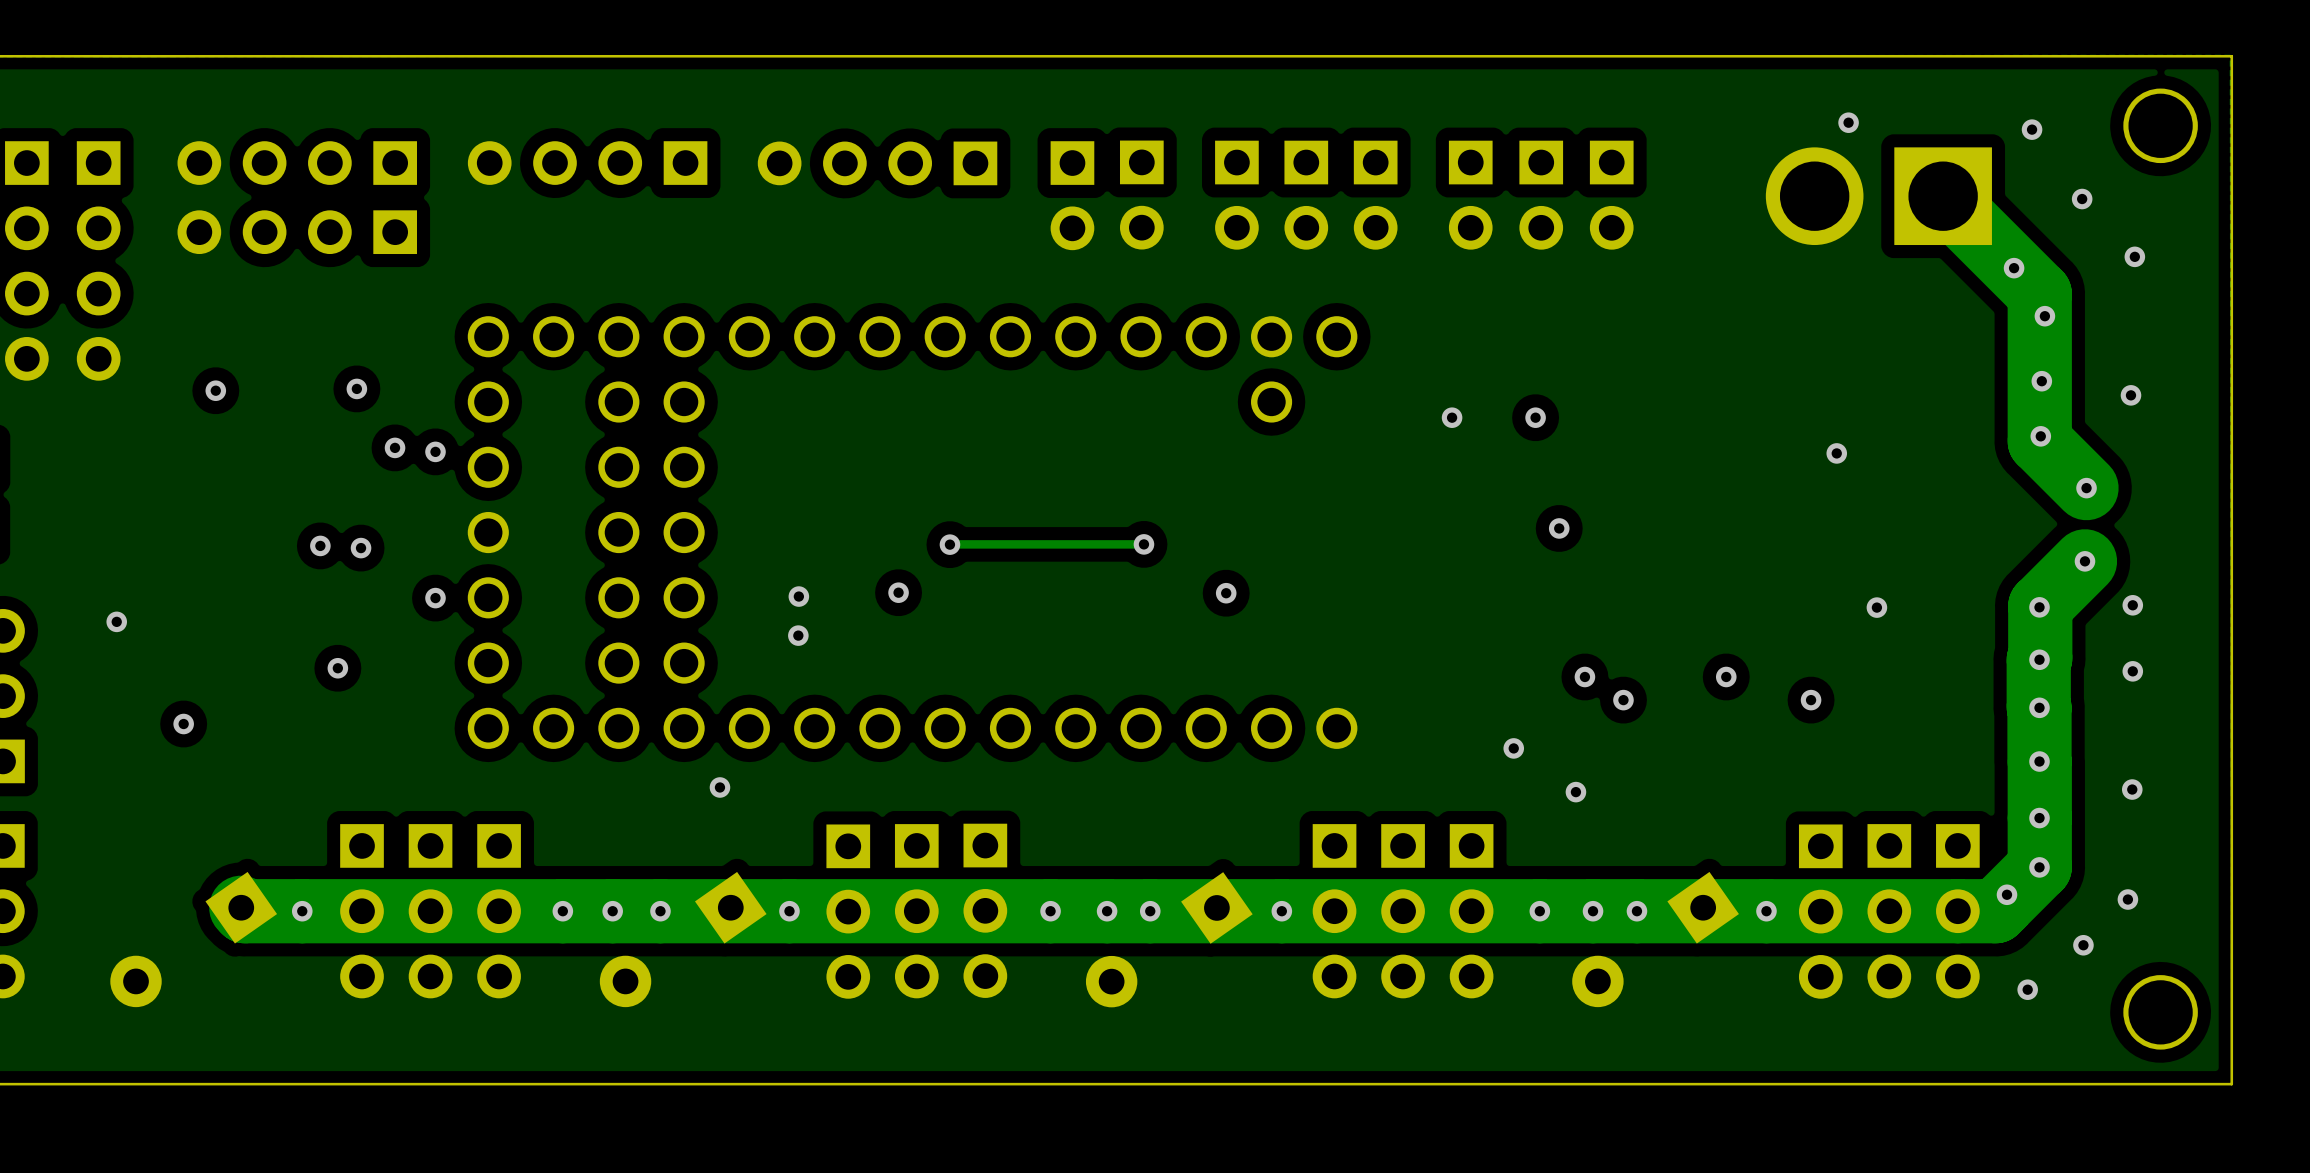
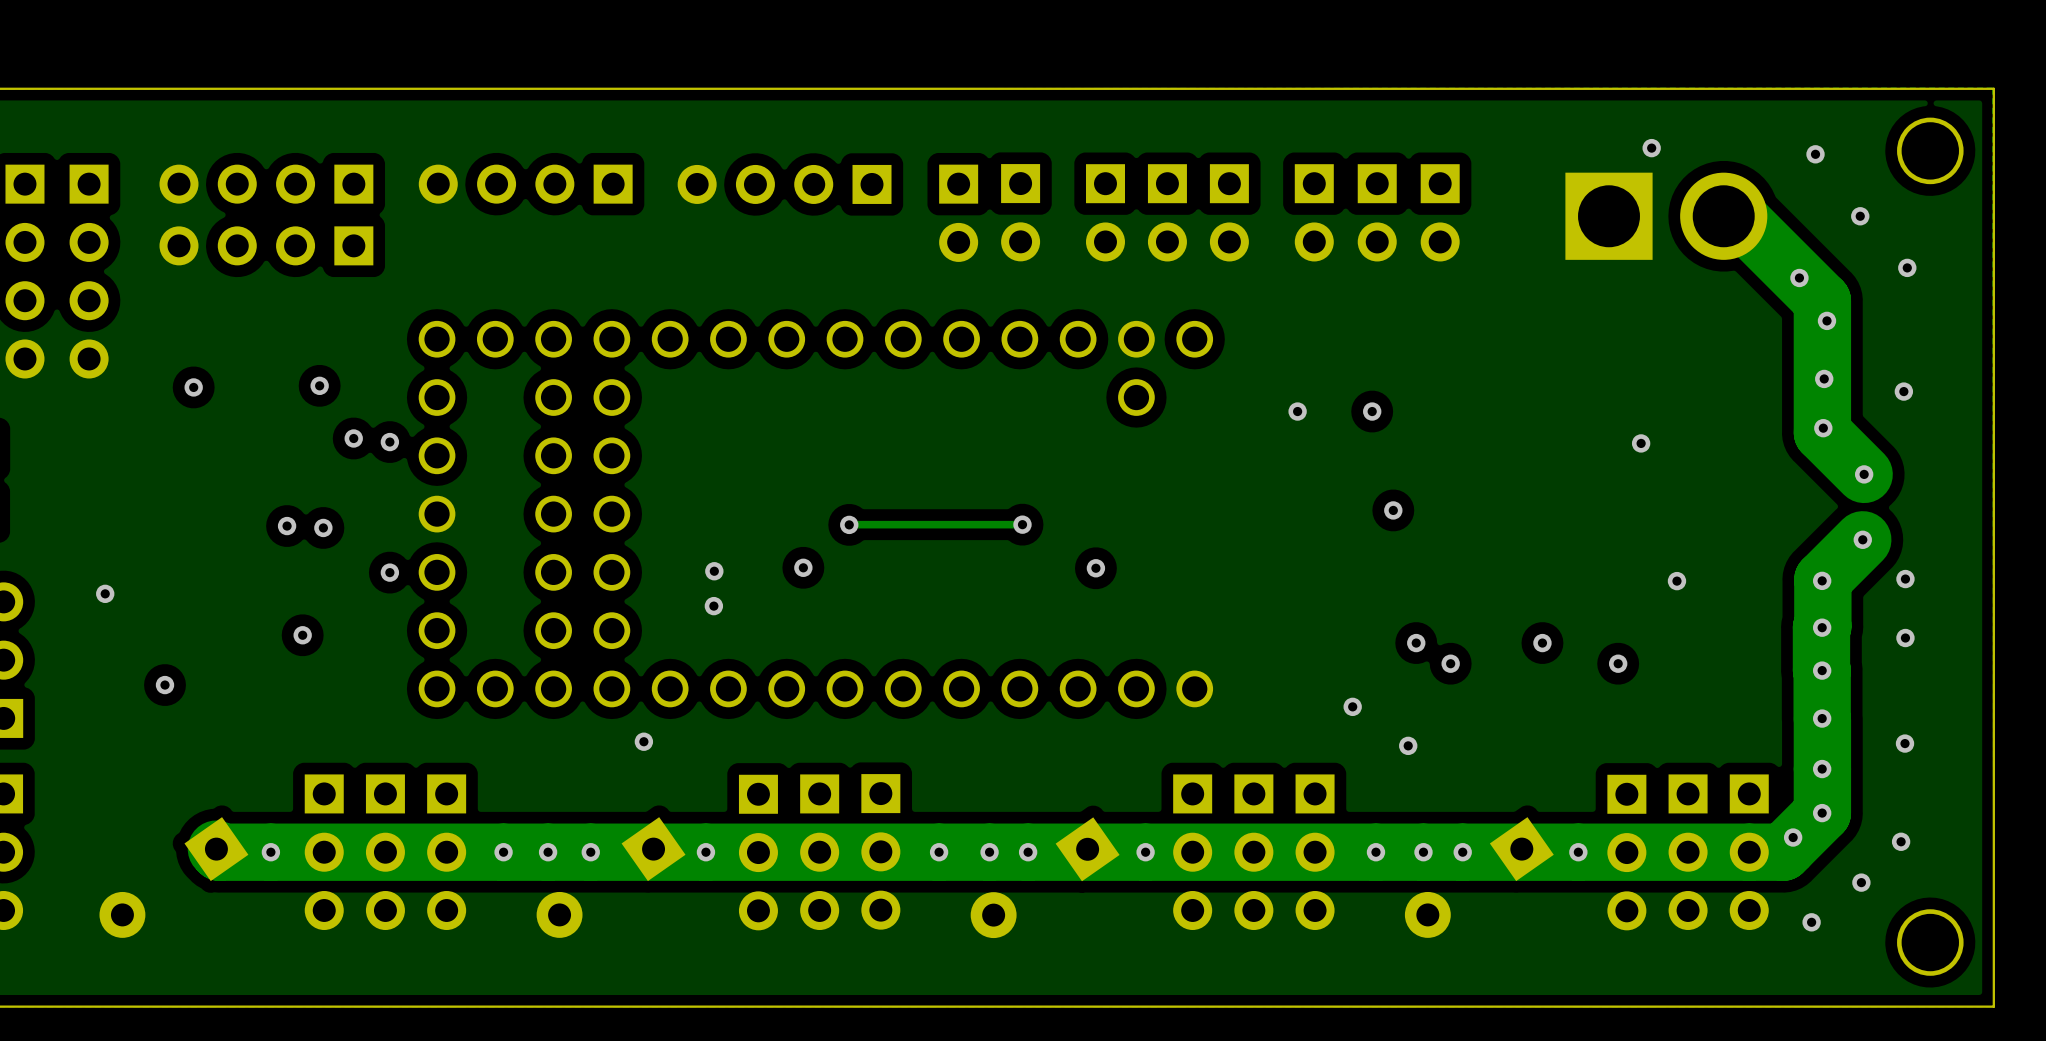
part rotation: 0° (1878, 196) -> 180° (1666, 216)

